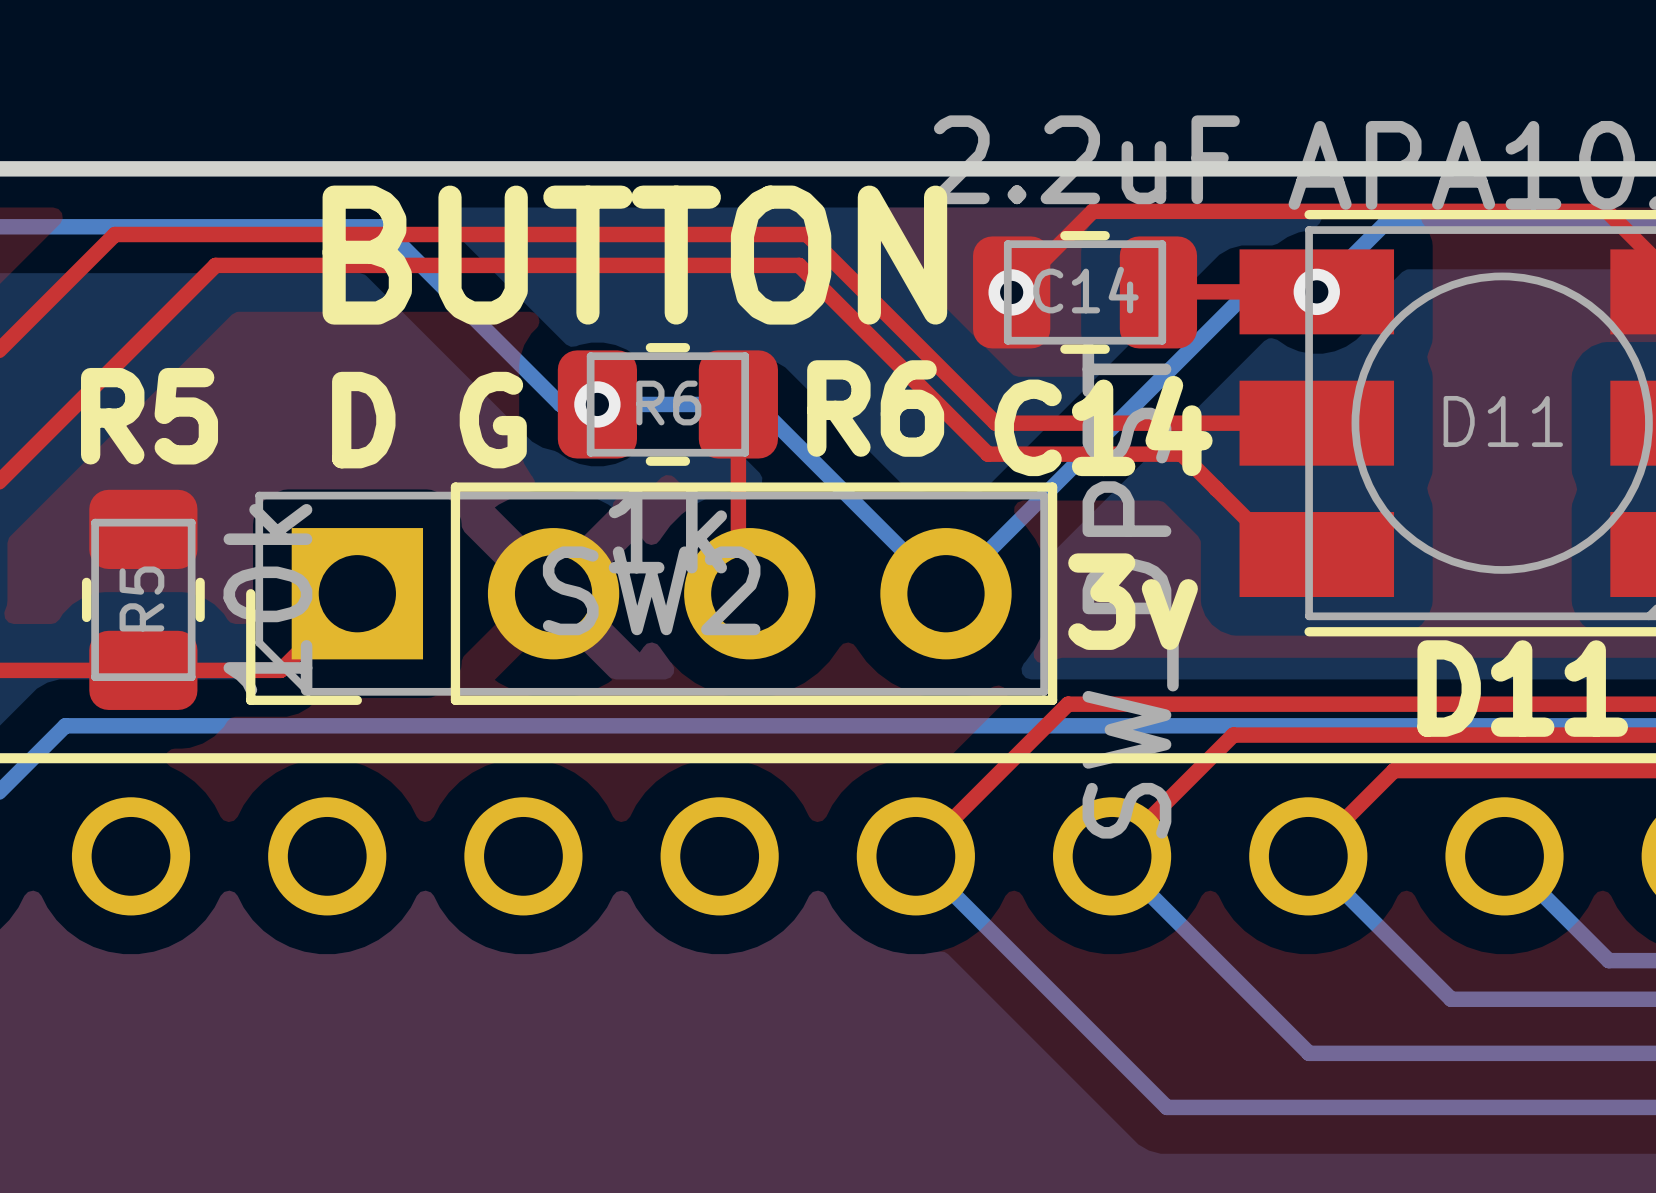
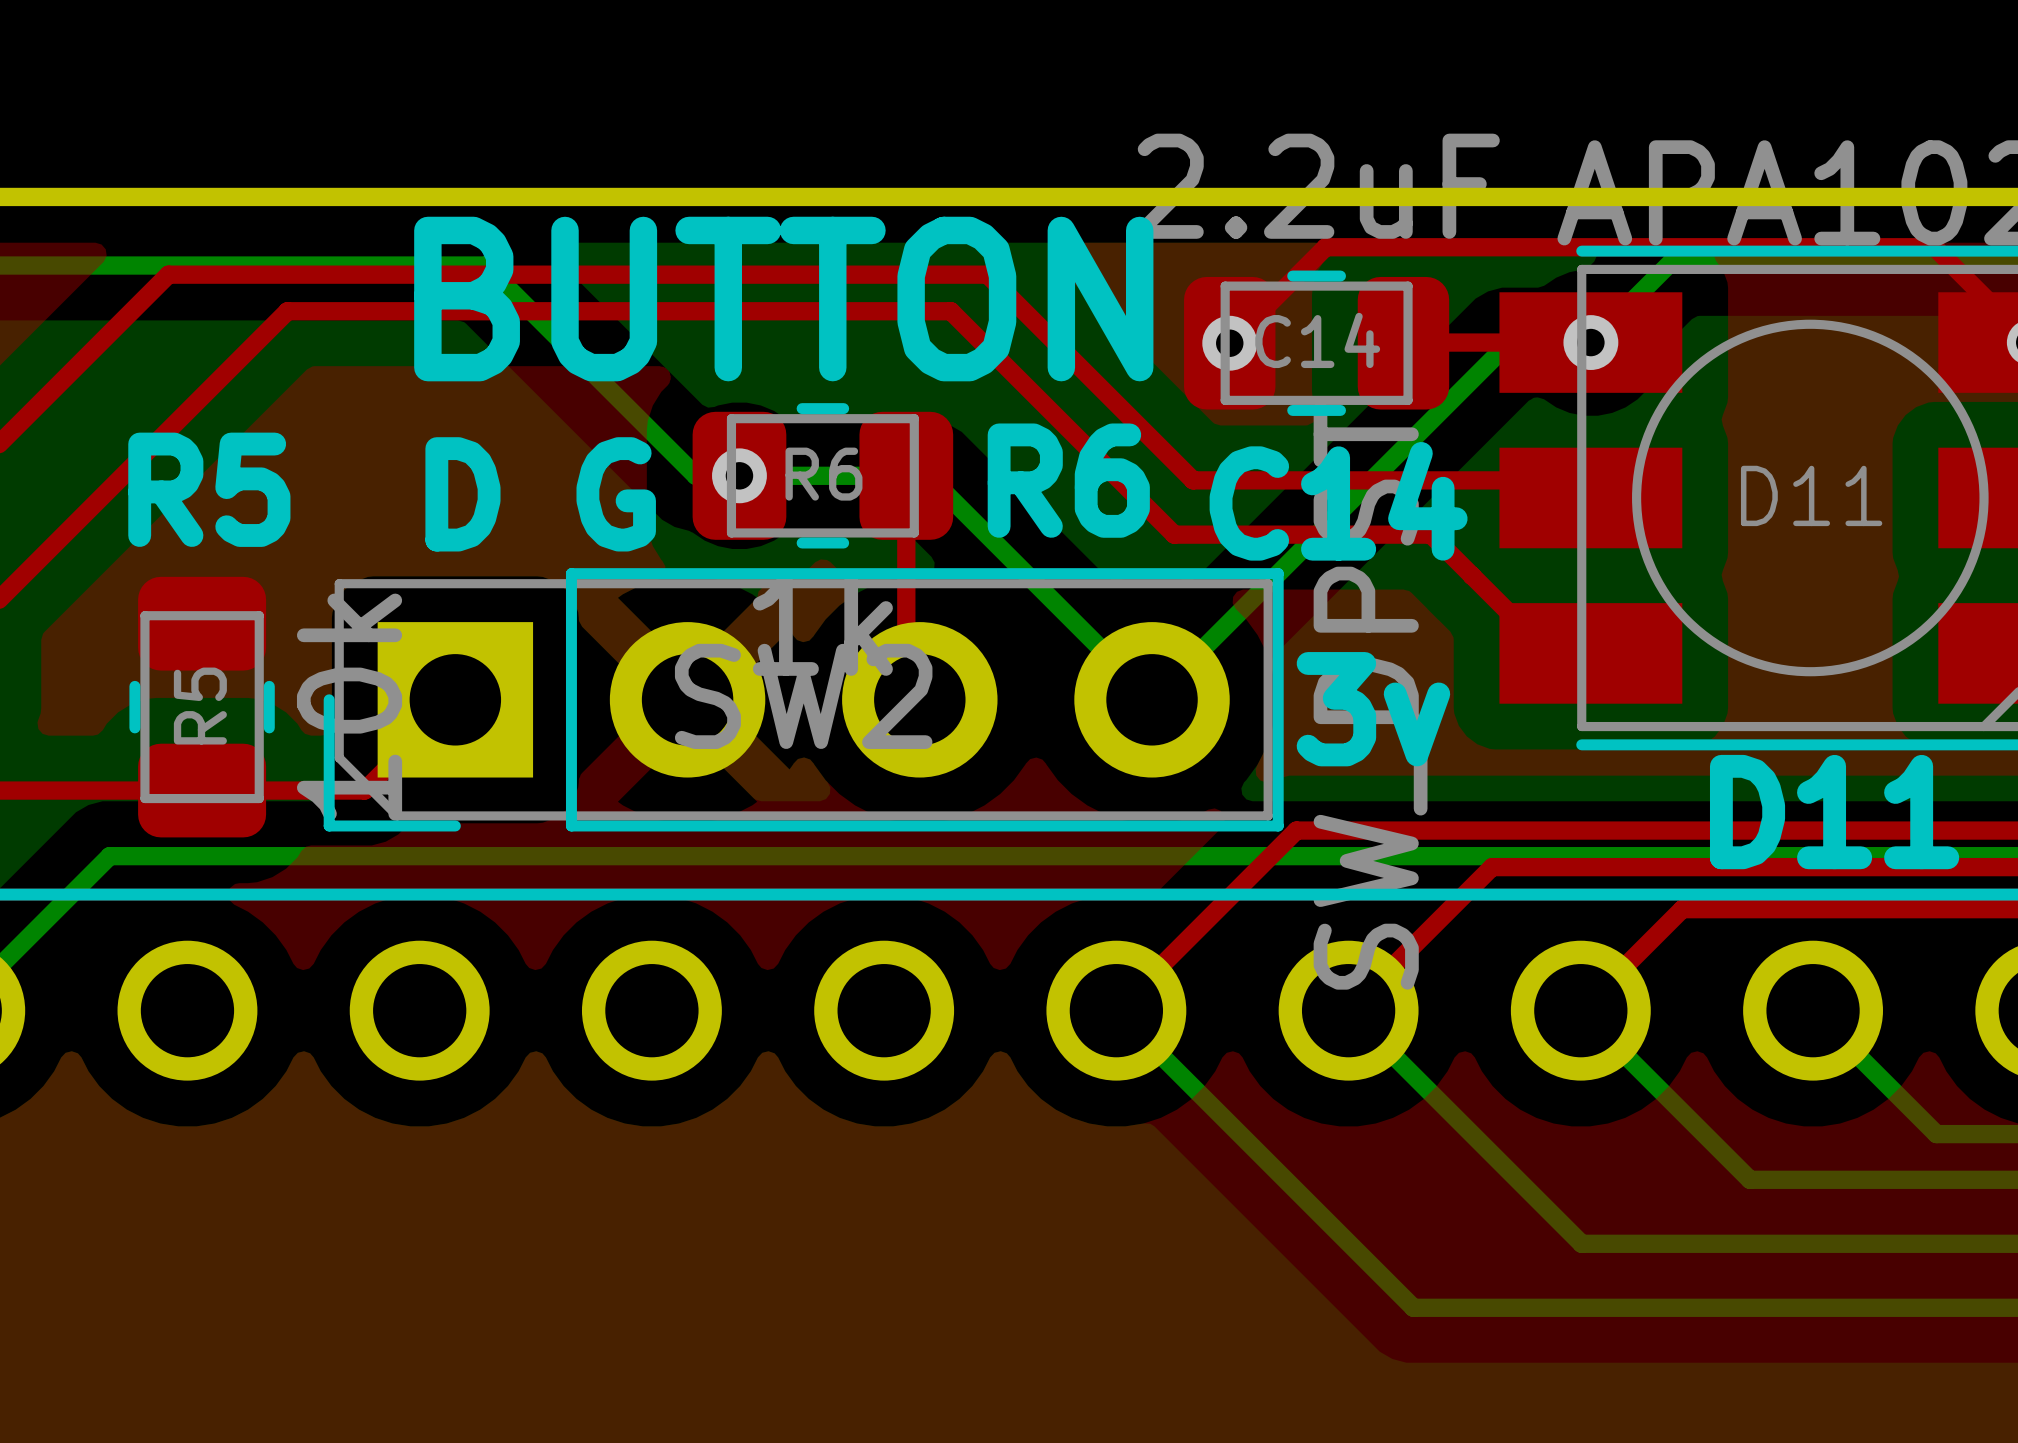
top track: (776, 265) (799, 265) (987, 454) -> (950, 311) (1174, 534) (1201, 534)
top track: (980, 408) (995, 423) (1316, 423) -> (1193, 480) (1573, 480) (1590, 497)

